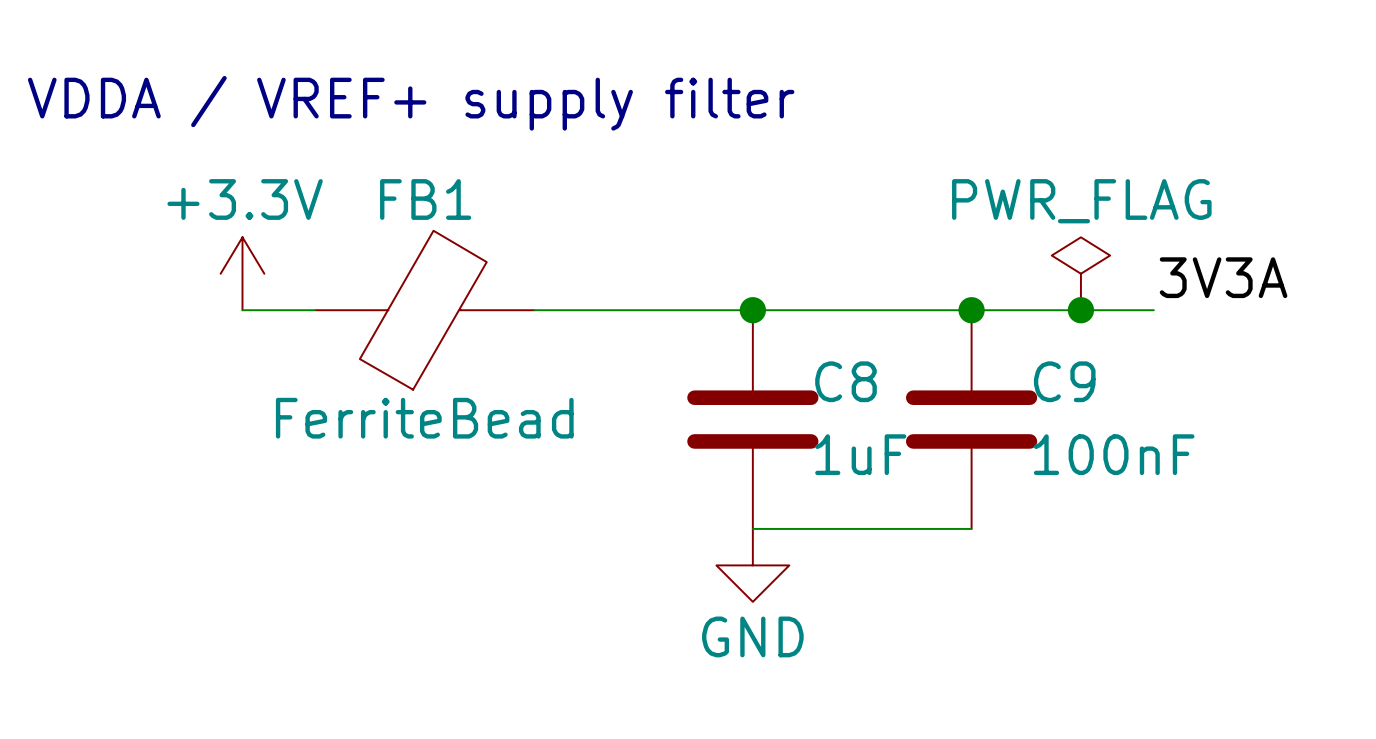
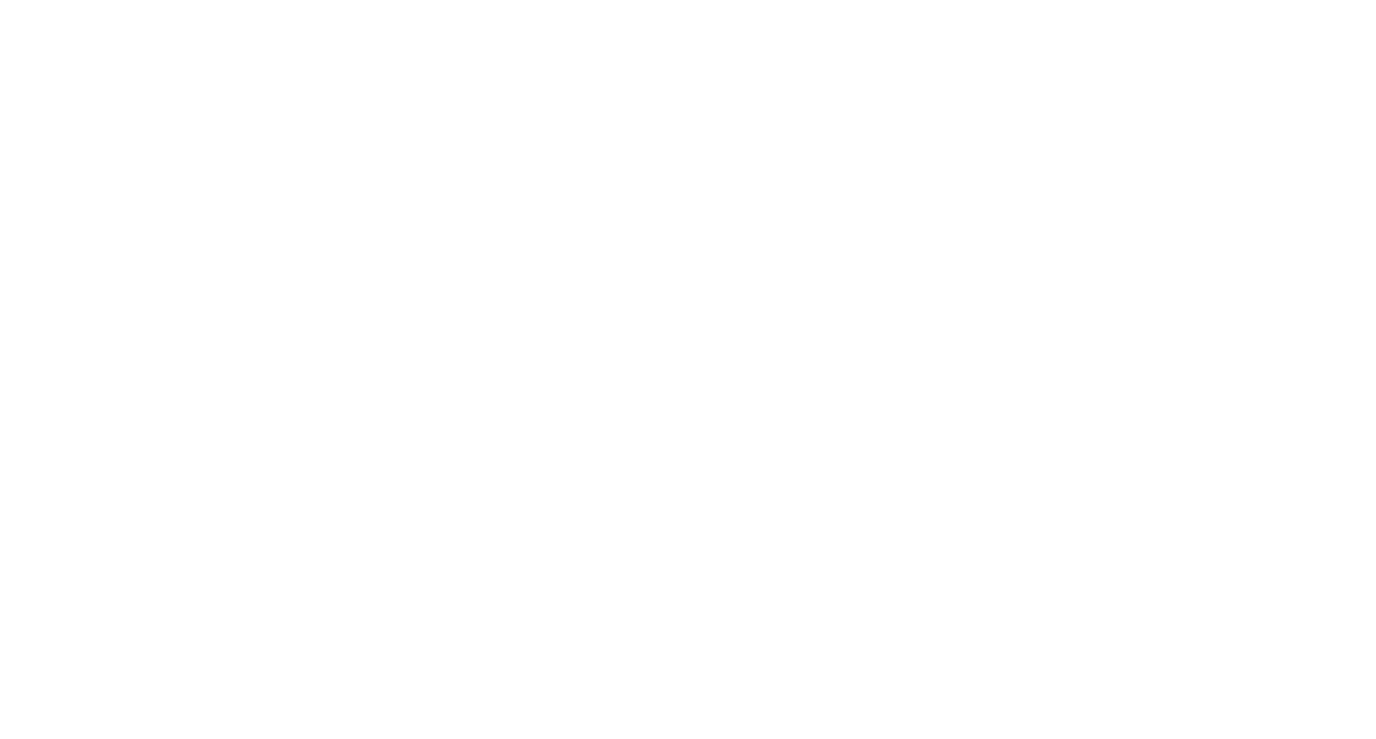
text: VDDA / VREF+ supply filter (411, 103) -> none
power symbol: +3.3V (242, 273) -> none
power symbol: PWR_FLAG (1080, 273) -> none
label: 3V3A (1223, 277) -> none
wire: (242, 310) (315, 310) -> none
FB1: FerriteBead (424, 310) -> none
wire: (534, 310) (1153, 310) -> none
junction: (752, 310) -> none
junction: (971, 310) -> none
junction: (1080, 310) -> none
C8: 1uF (752, 419) -> none
C9: 100nF (971, 419) -> none
wire: (752, 528) (971, 528) -> none
power symbol: GND (752, 565) -> none

